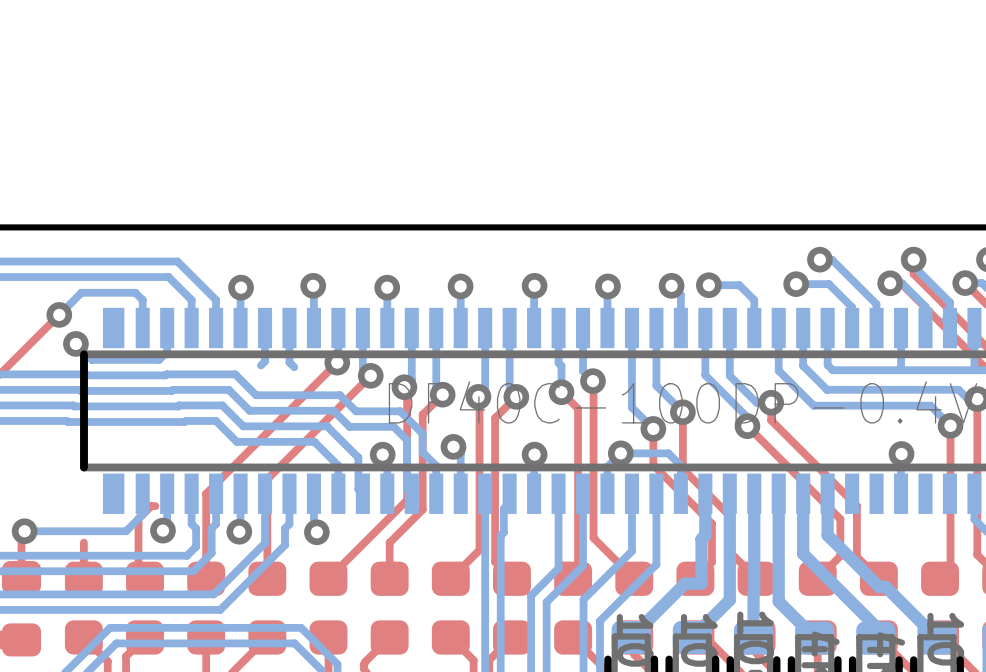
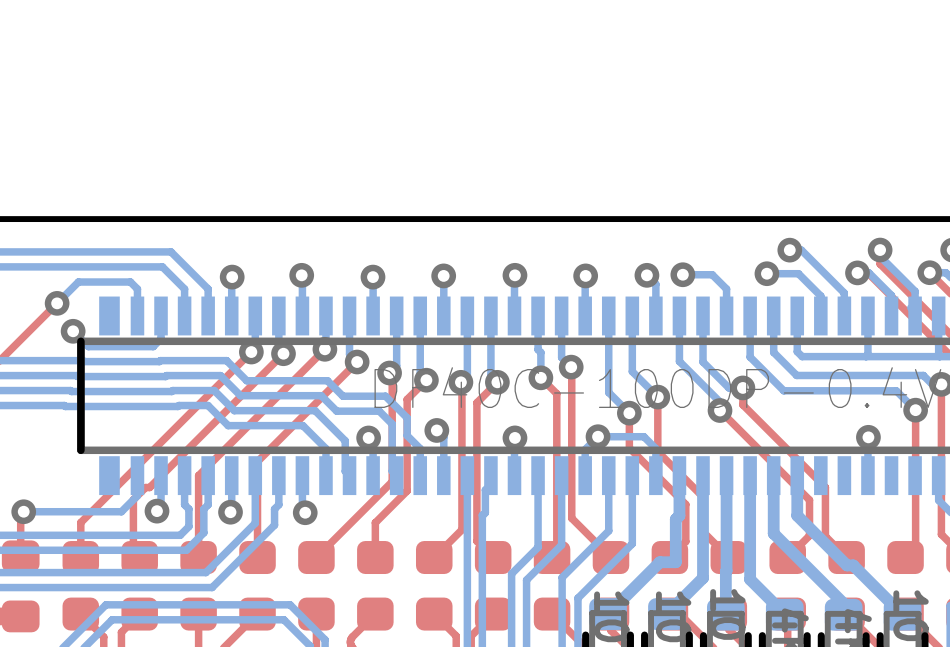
top track: none -> (251, 352) (80, 522)
via: none -> (251, 352)
top track: none -> (283, 353) (149, 487)
via: none -> (283, 353)

